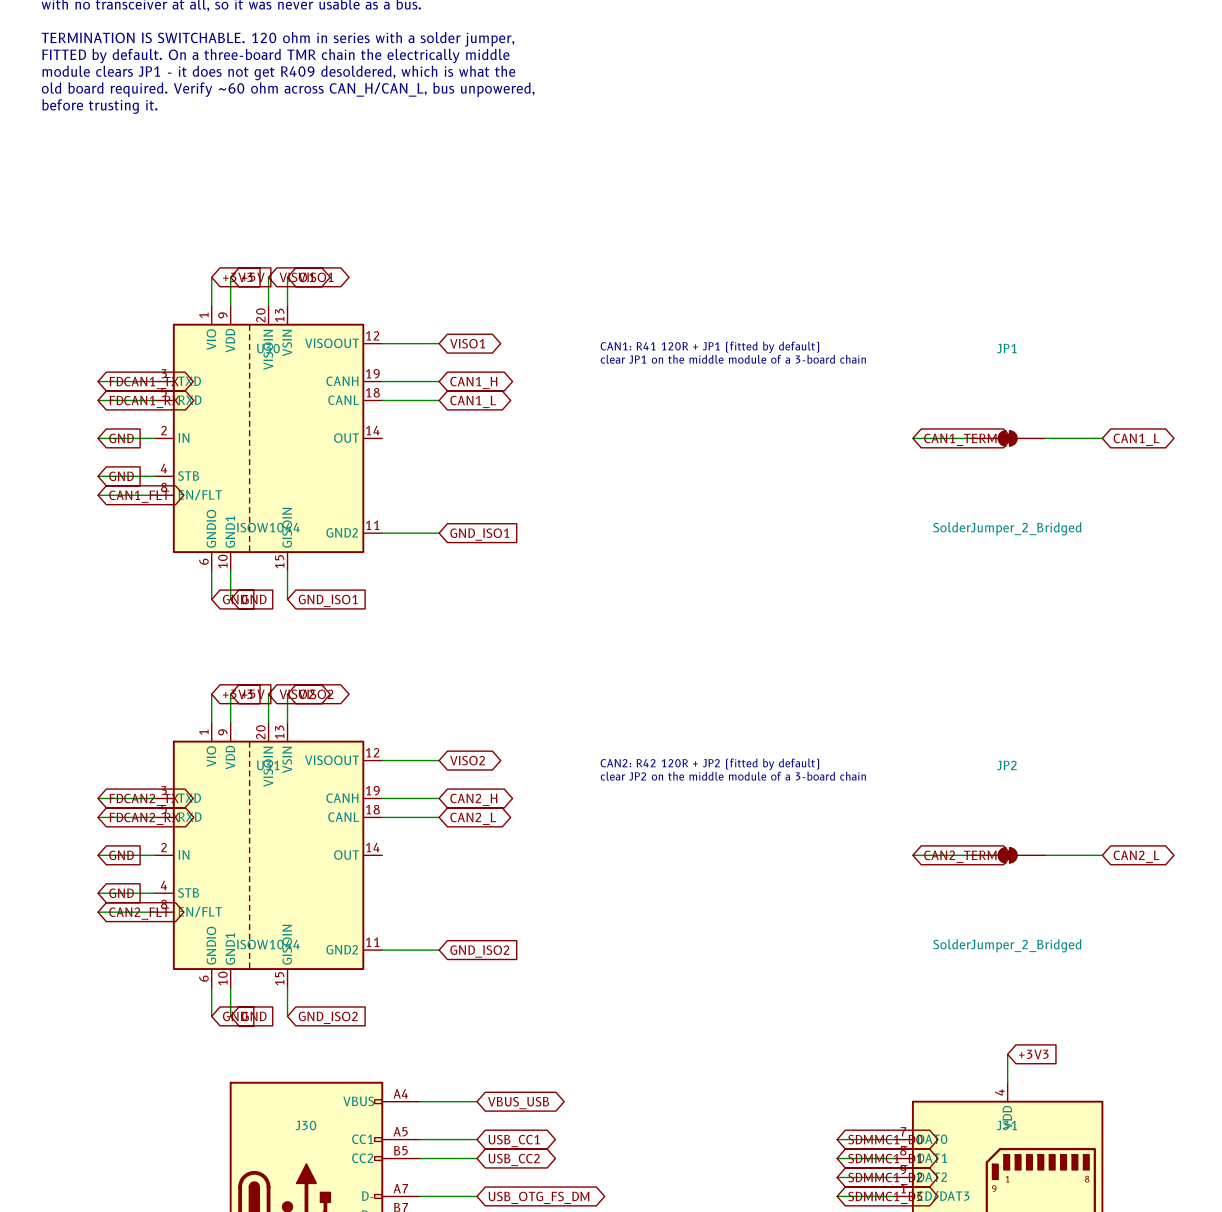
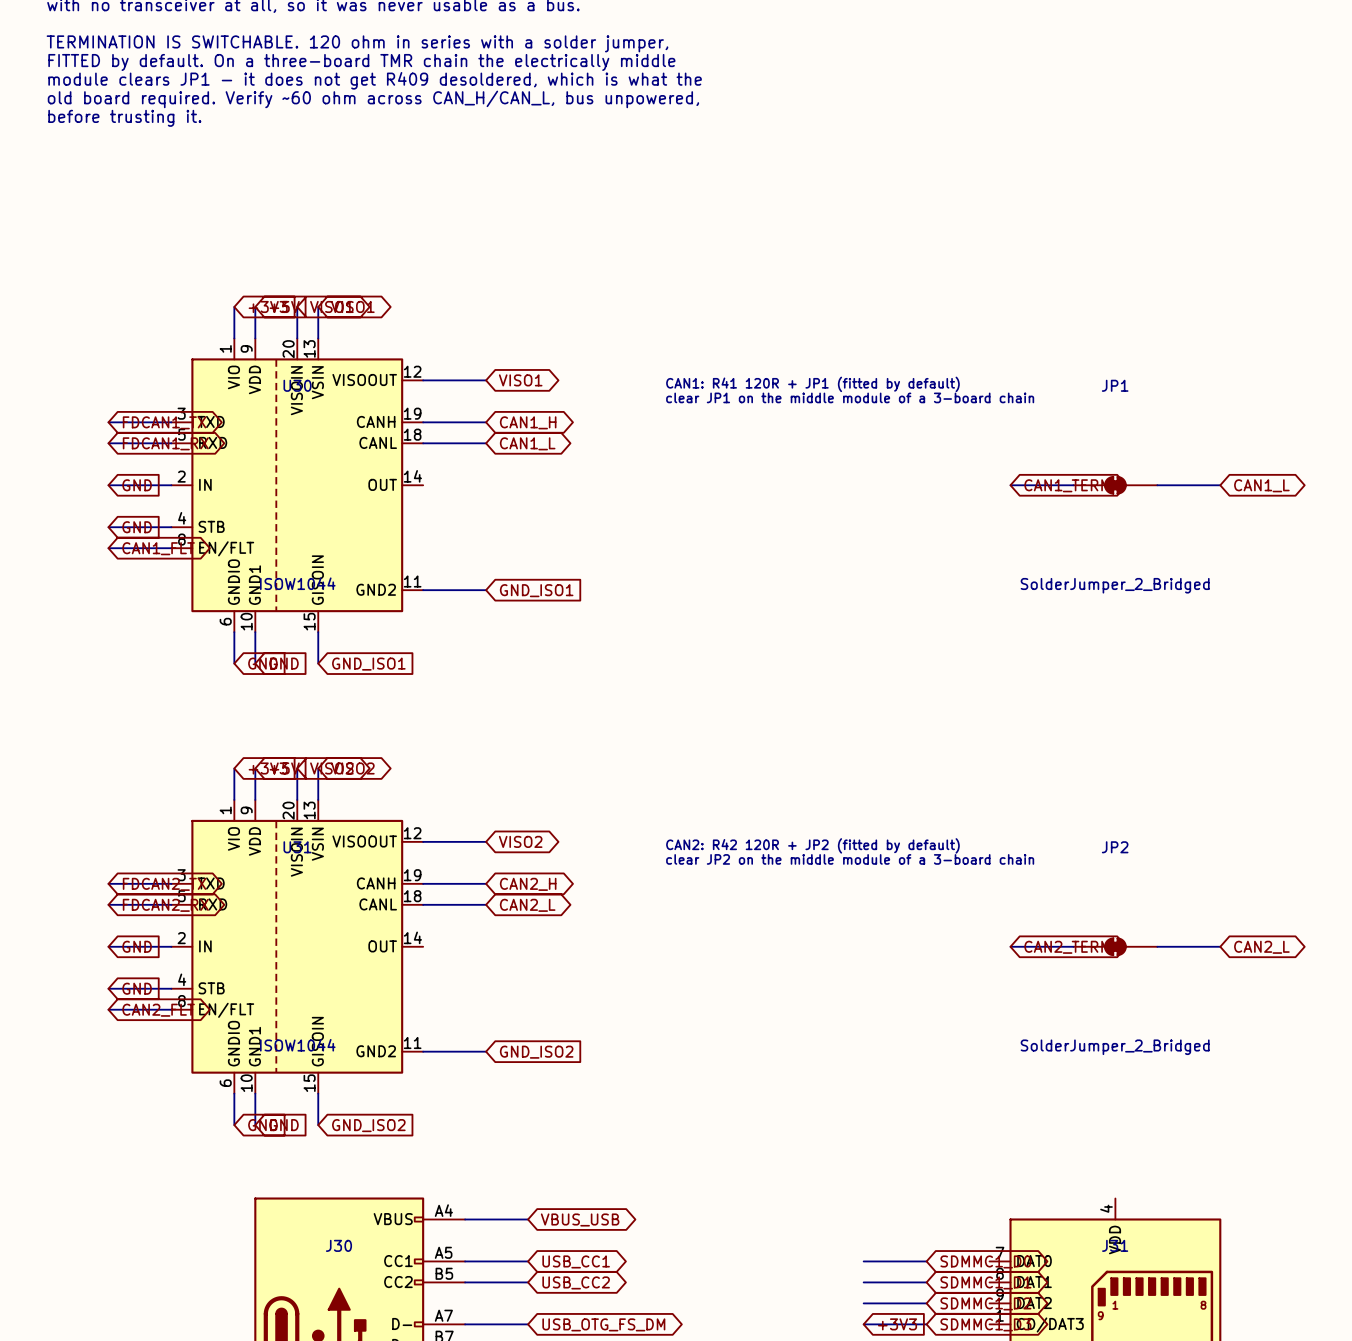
wire: (1007, 1054) (1007, 1082) -> none
global label: +3V3 (1033, 1054) -> none
wire: (837, 1139) (893, 1139) -> (926, 1261) (863, 1261)
wire: (837, 1158) (893, 1158) -> (926, 1282) (863, 1282)
wire: (837, 1177) (893, 1177) -> (926, 1303) (863, 1303)
global label: none -> +3V3 (897, 1324)
wire: (837, 1196) (893, 1196) -> (926, 1324) (863, 1324)

